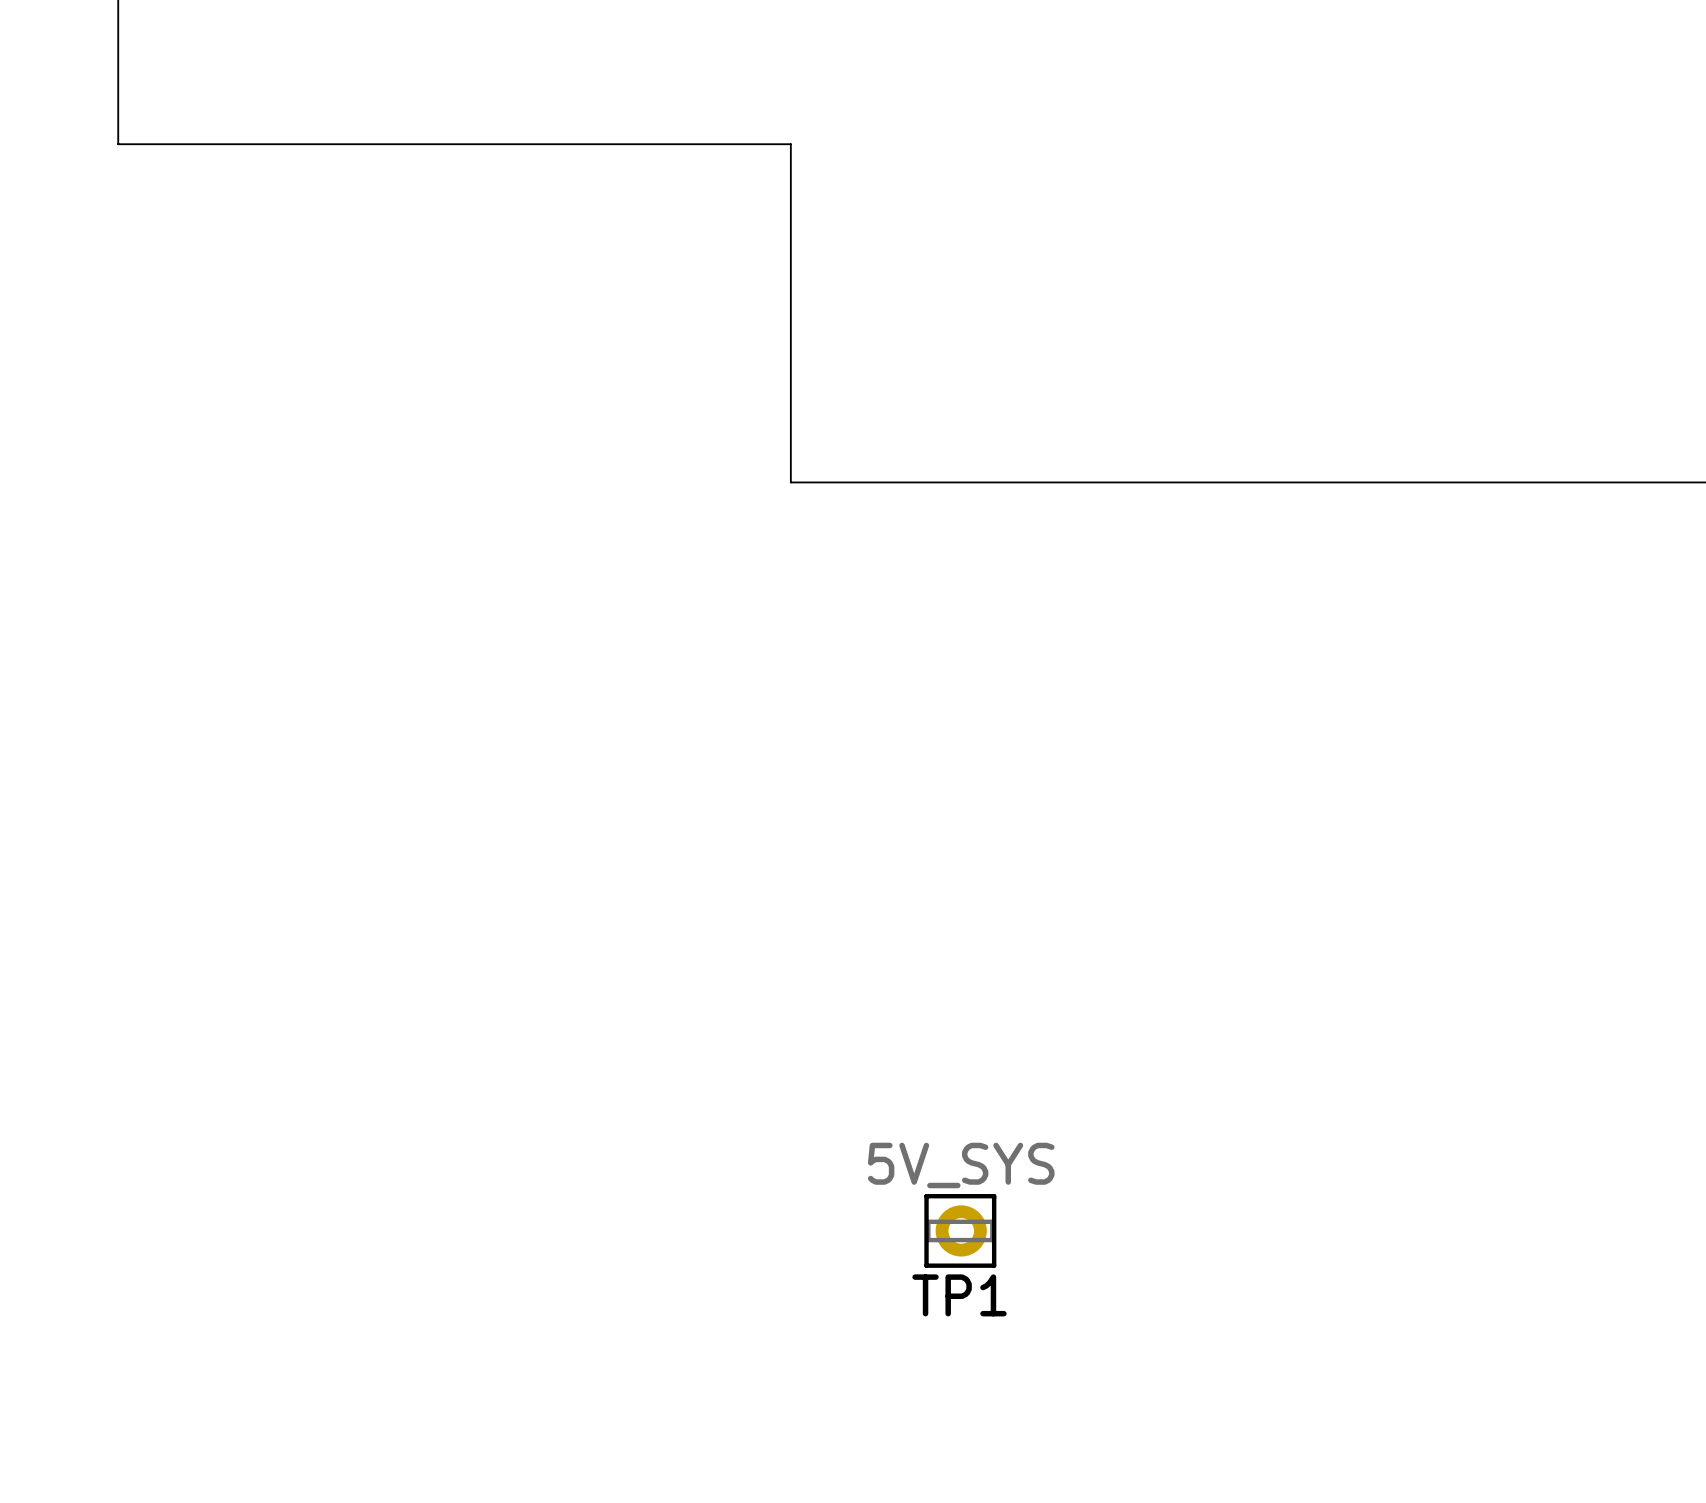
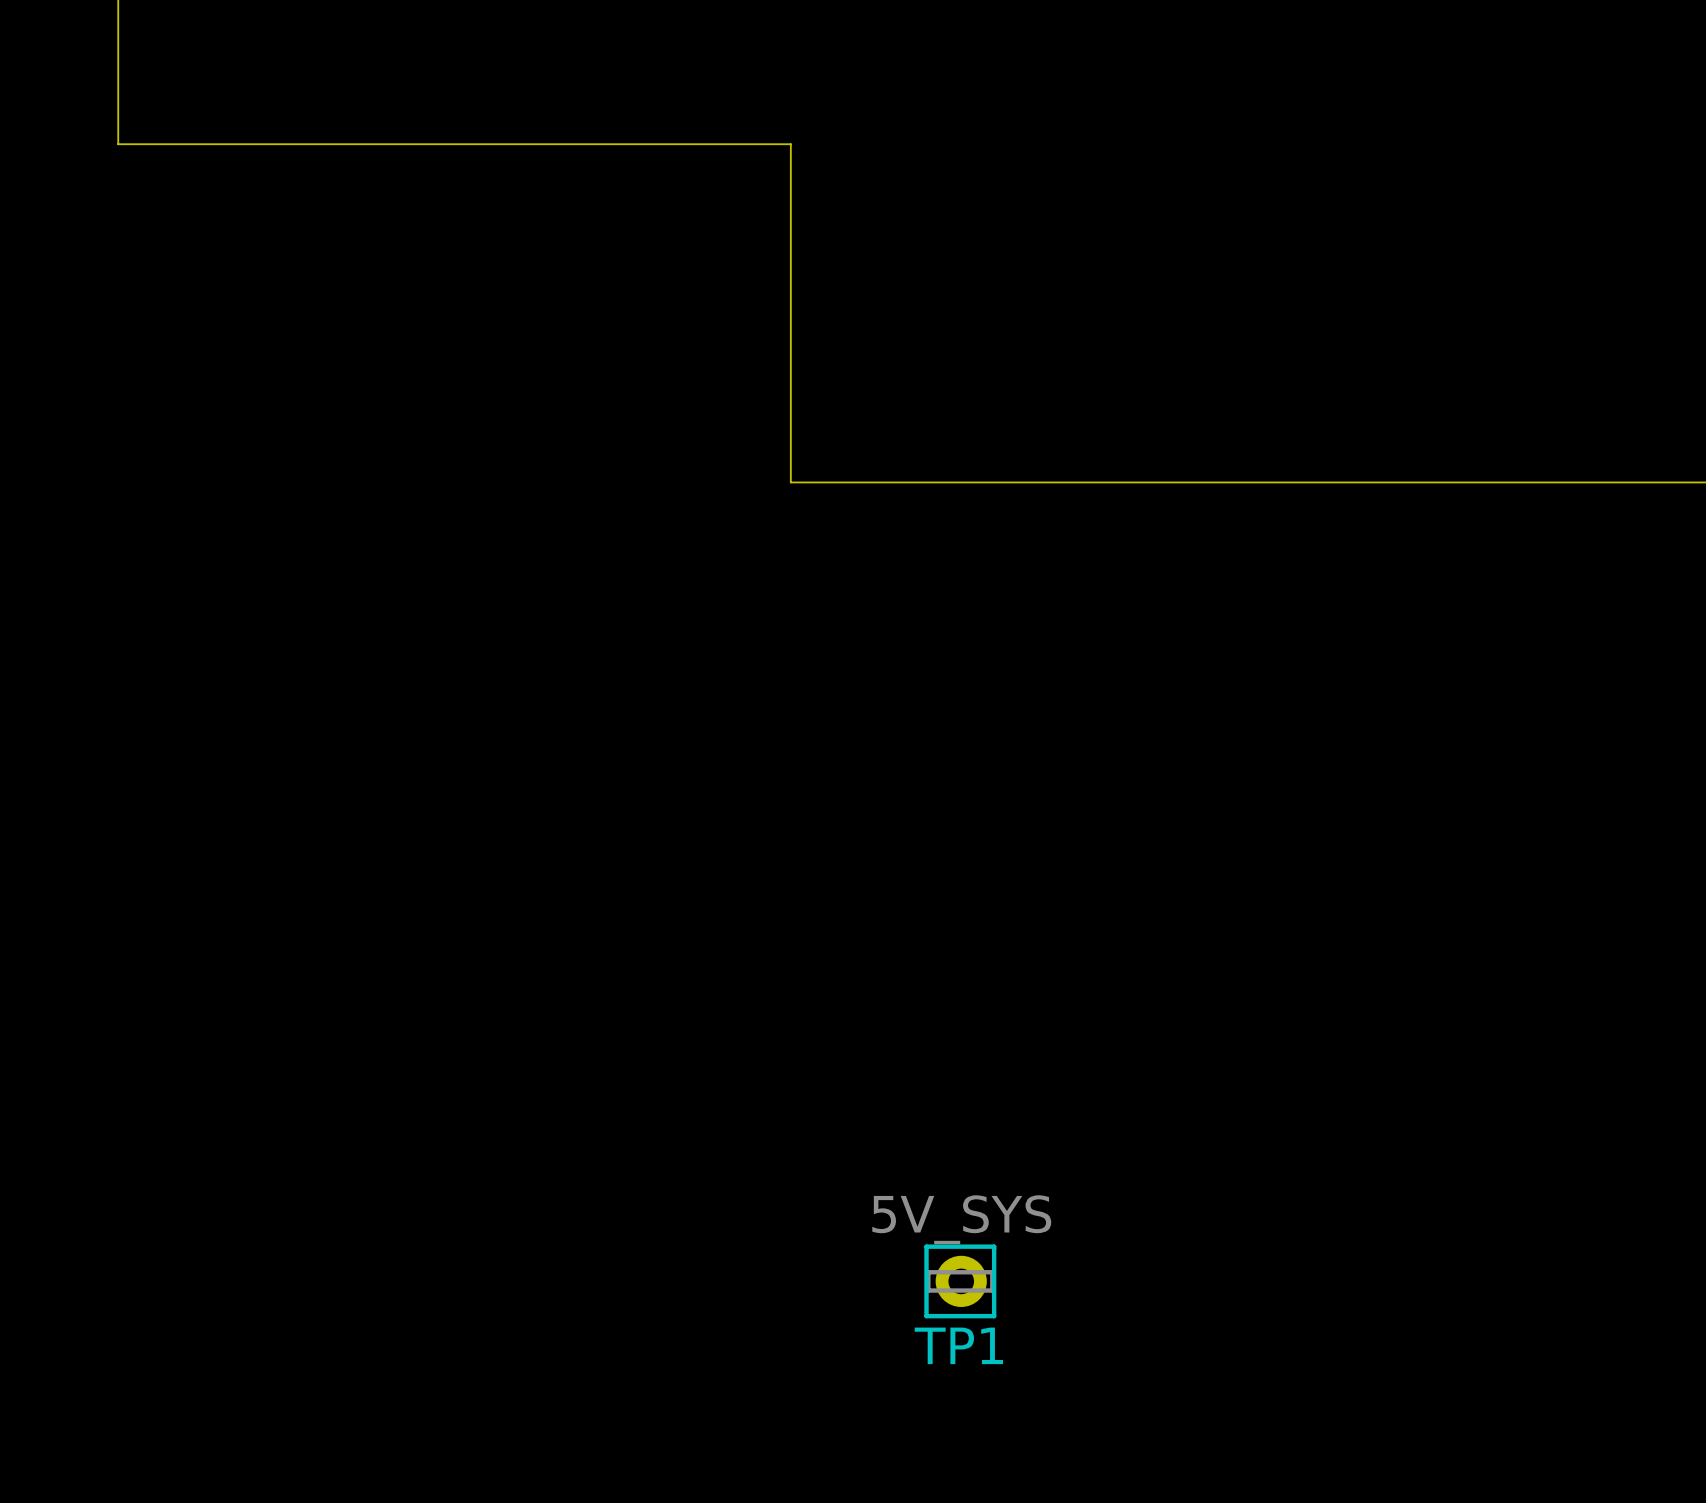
TP1 position: (960, 1230) -> (960, 1281)

